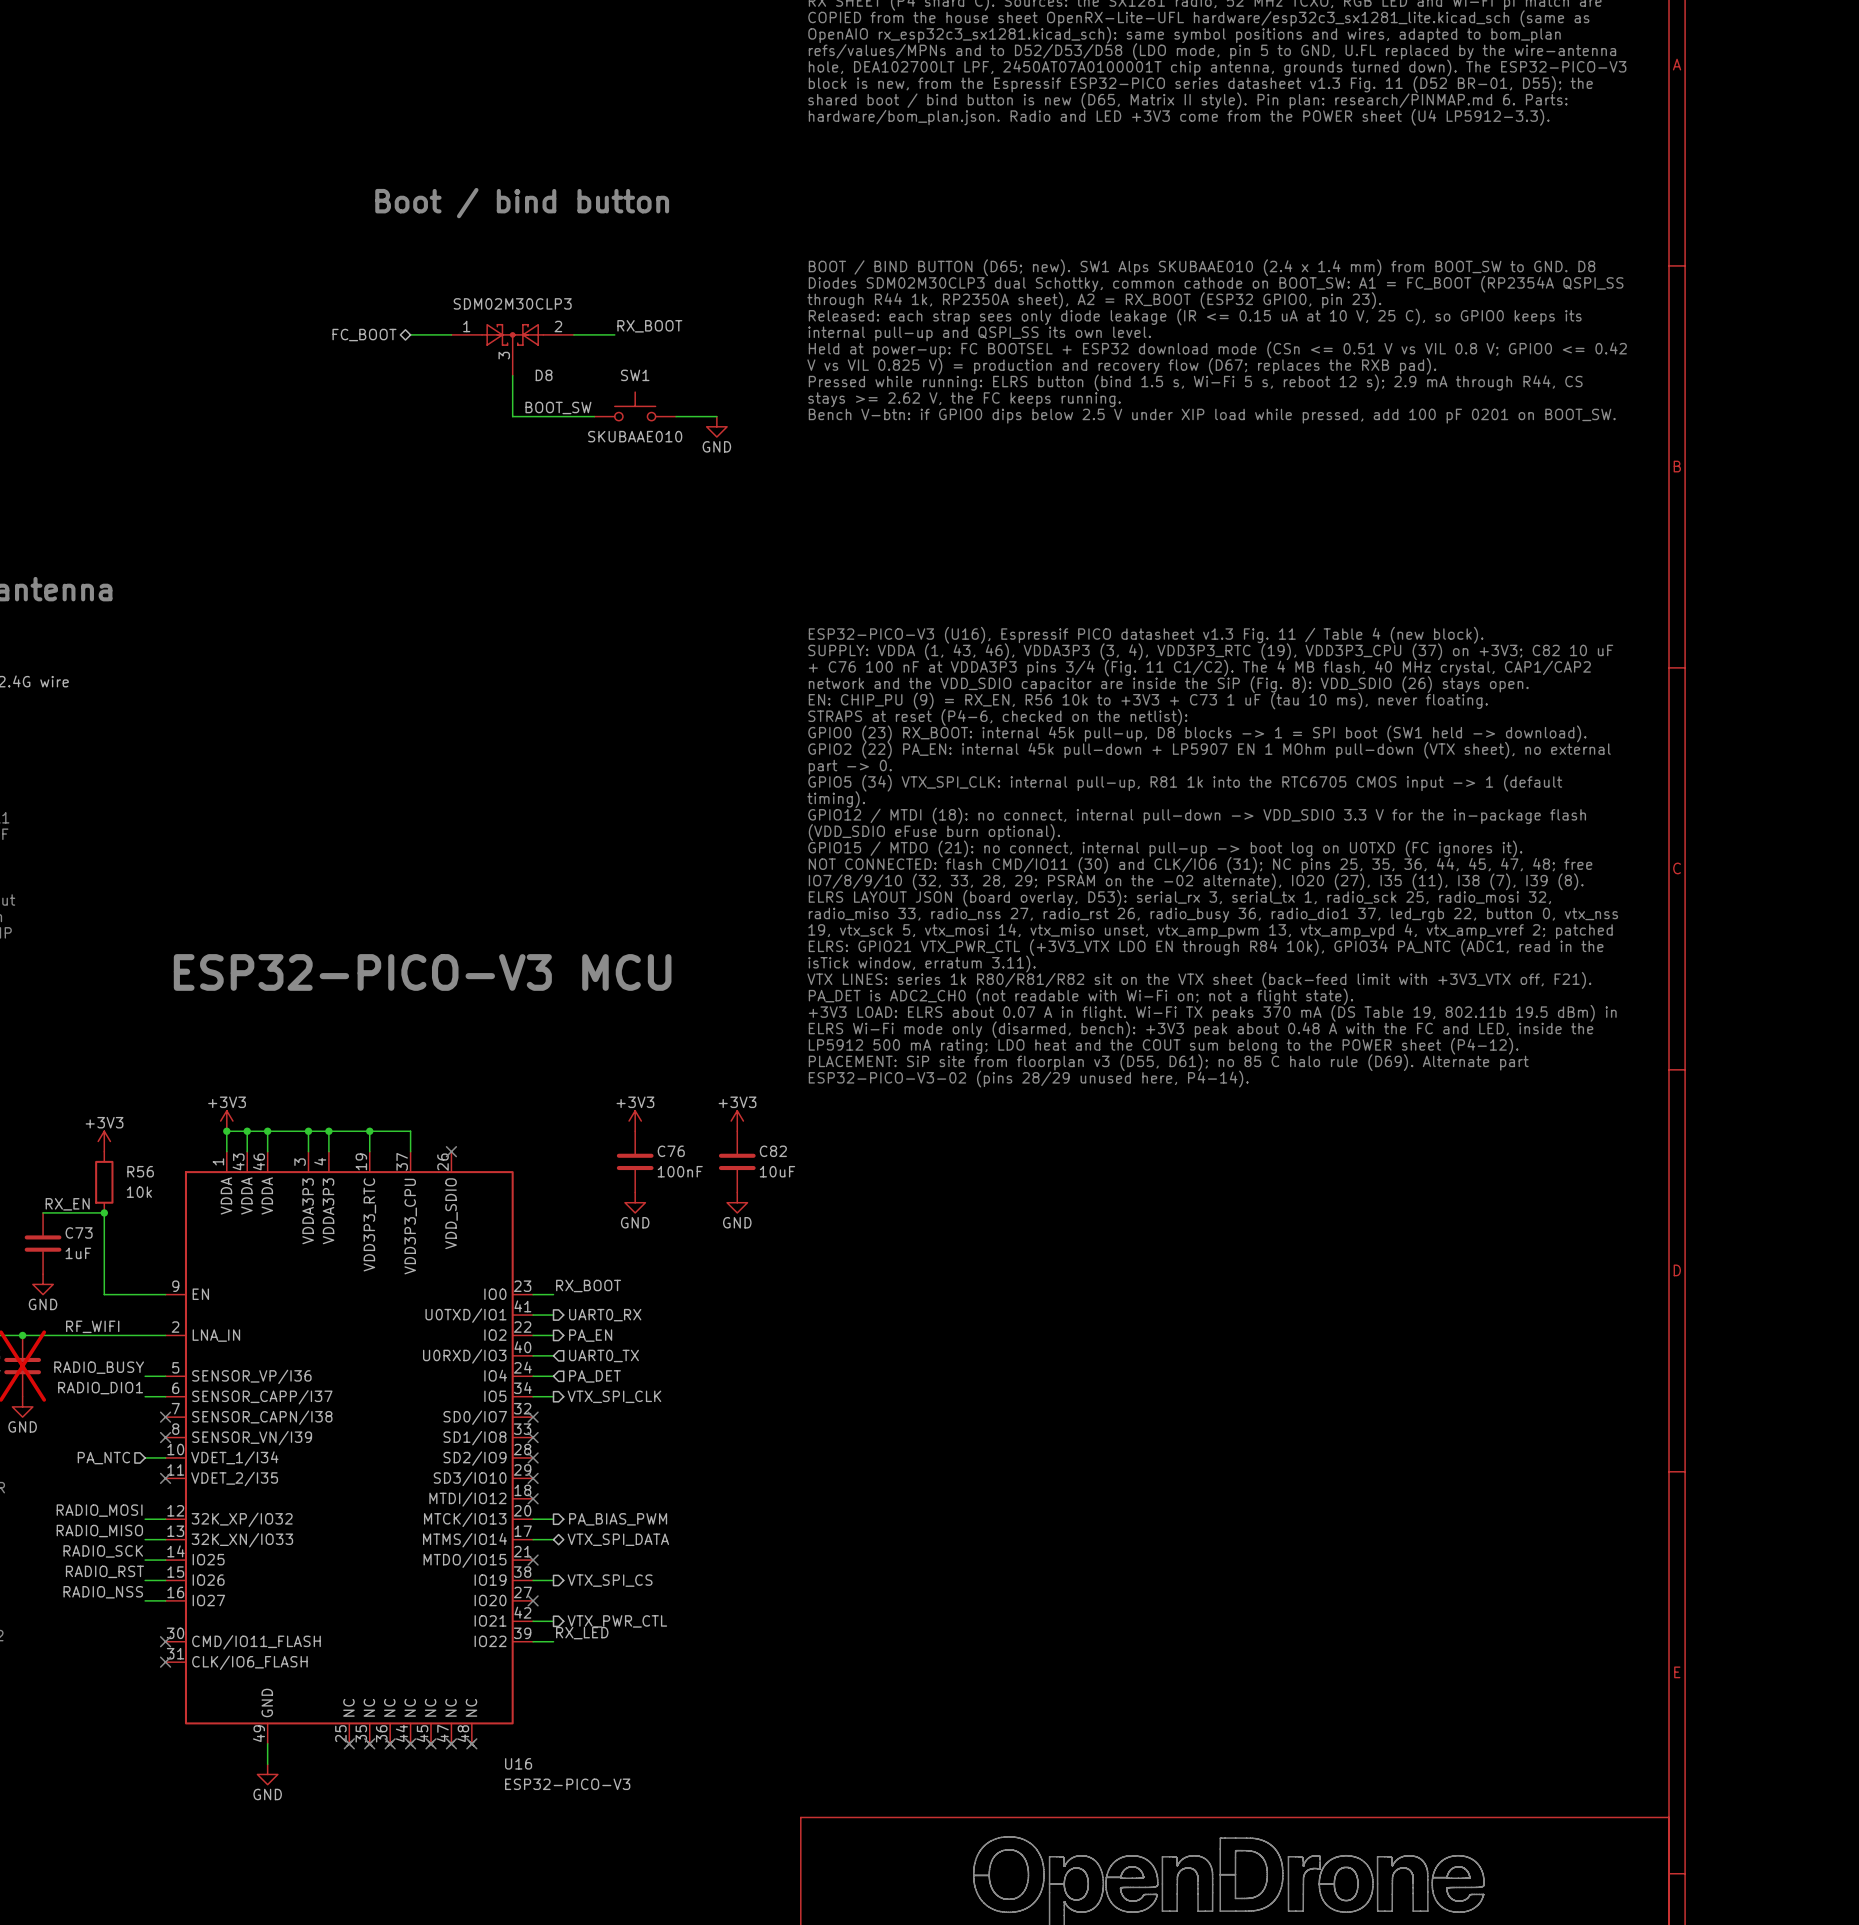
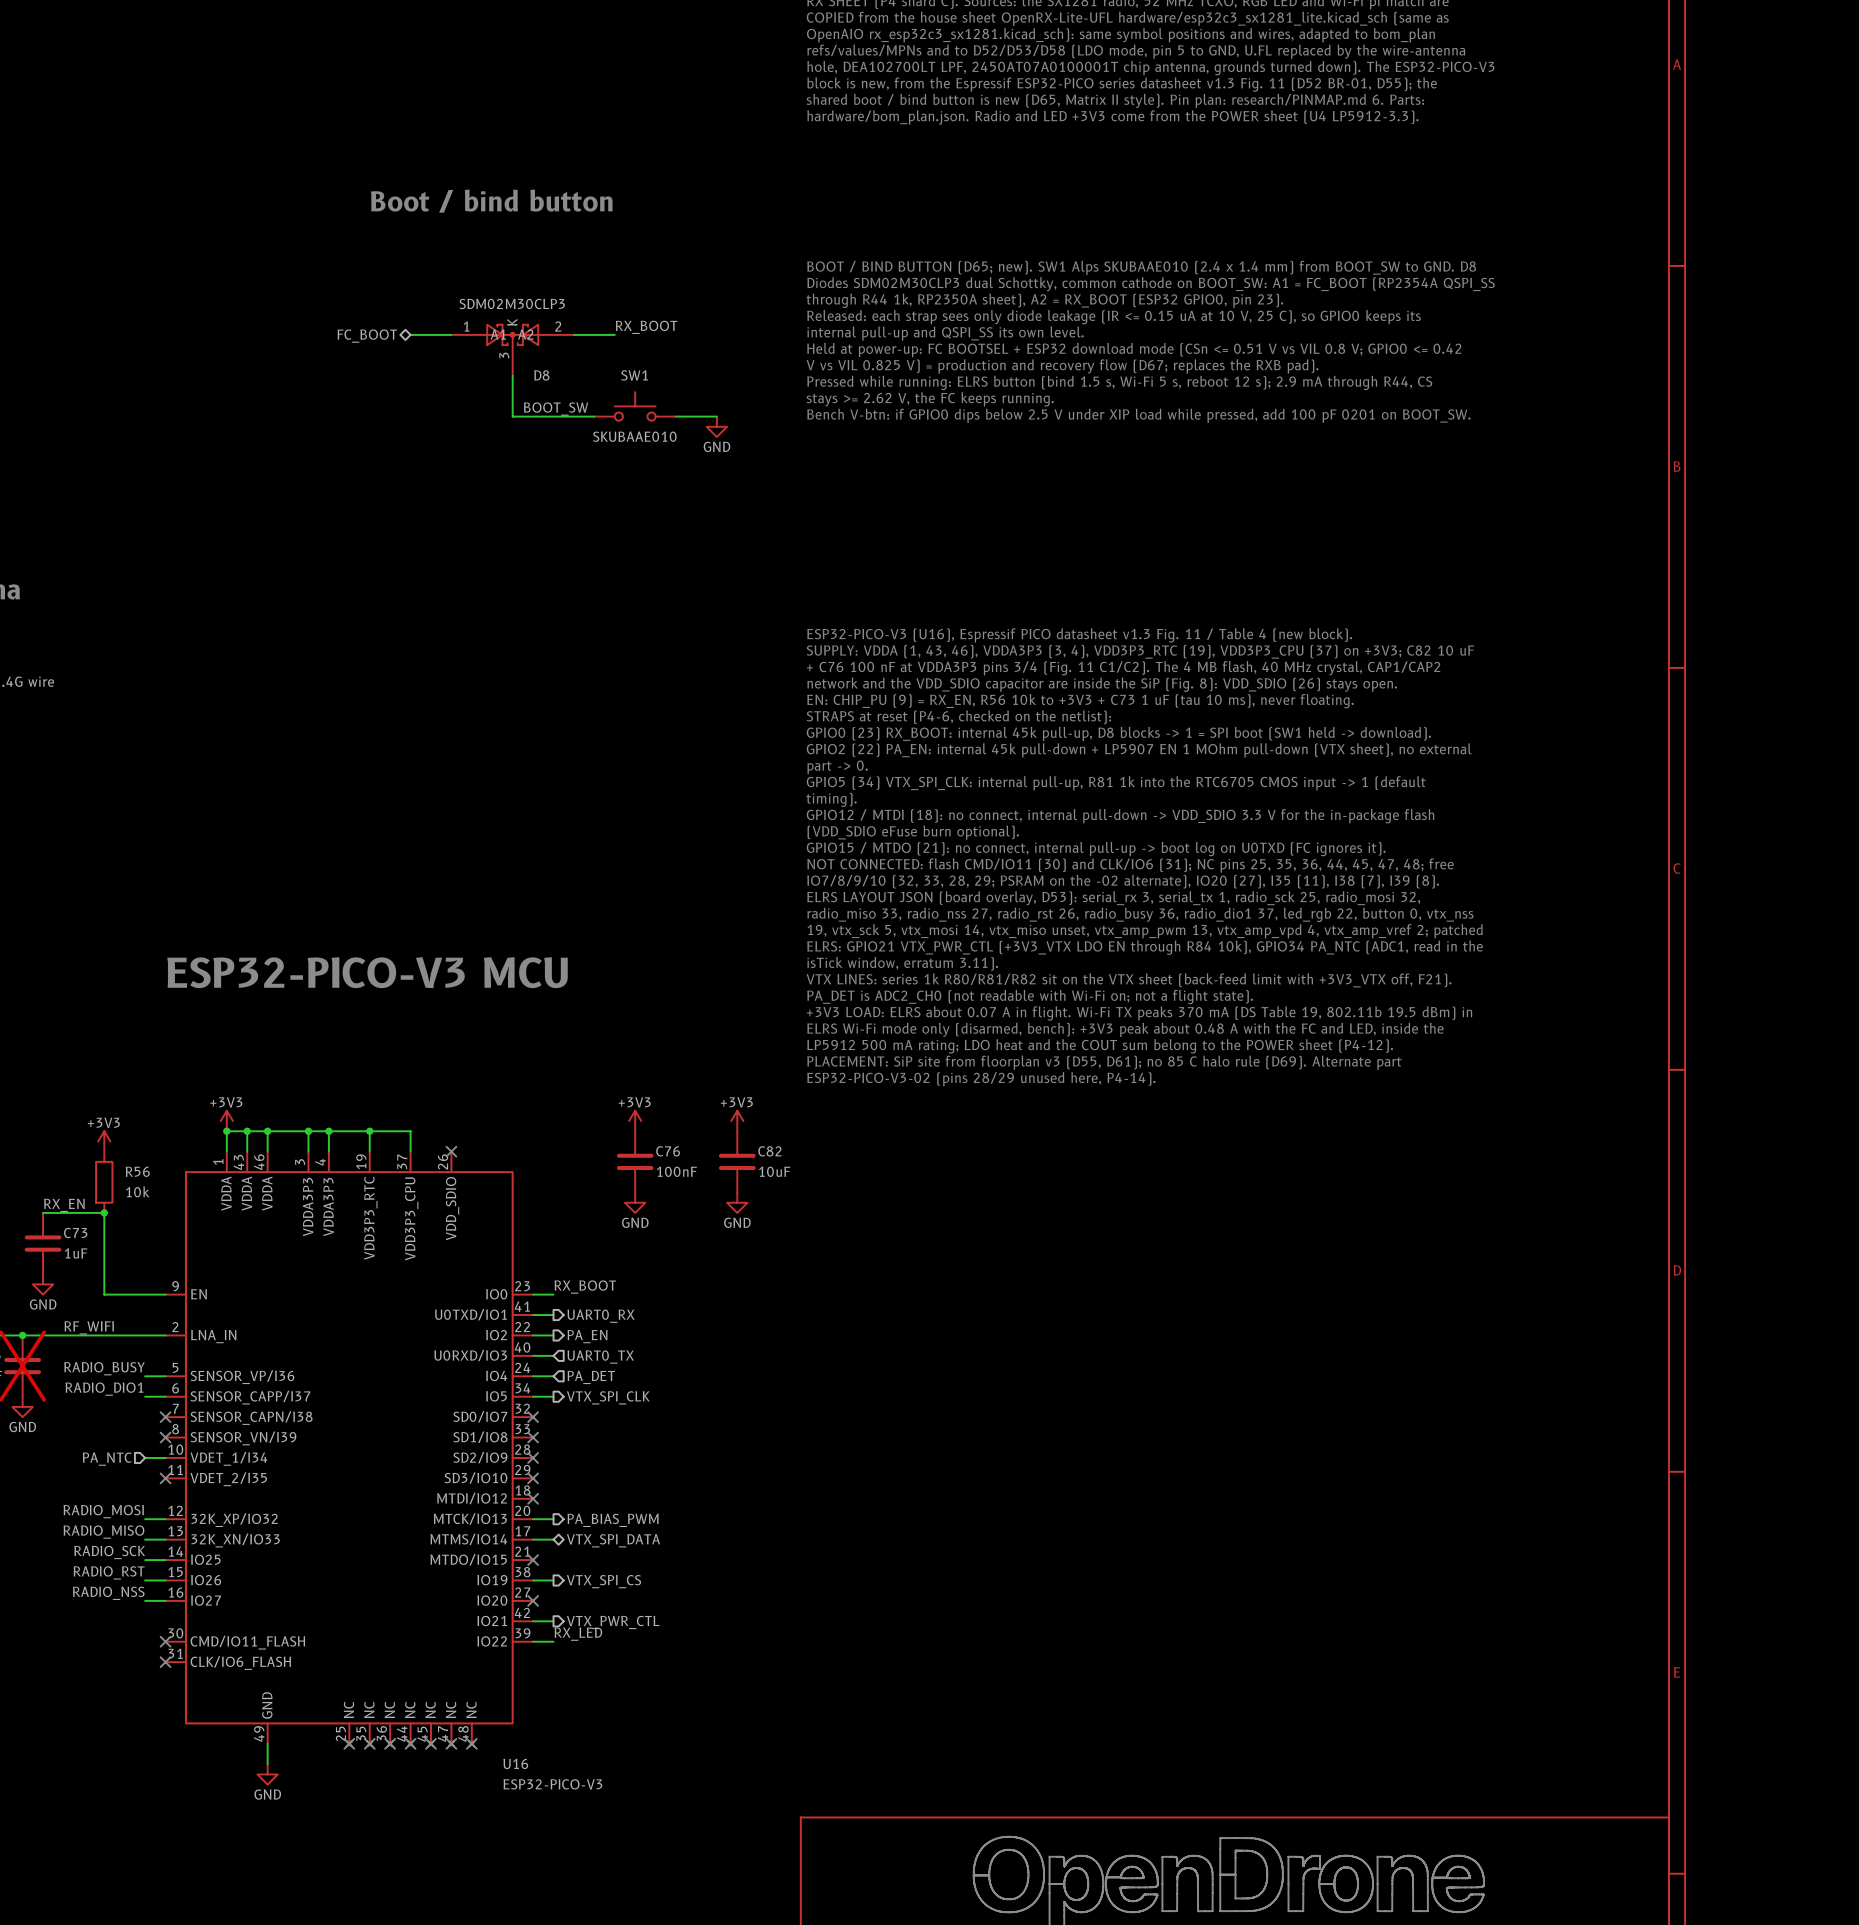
D8 pin name: none -> K (512, 322)
D8 pin name: none -> A1 (498, 334)
D8 pin name: none -> A2 (525, 334)

